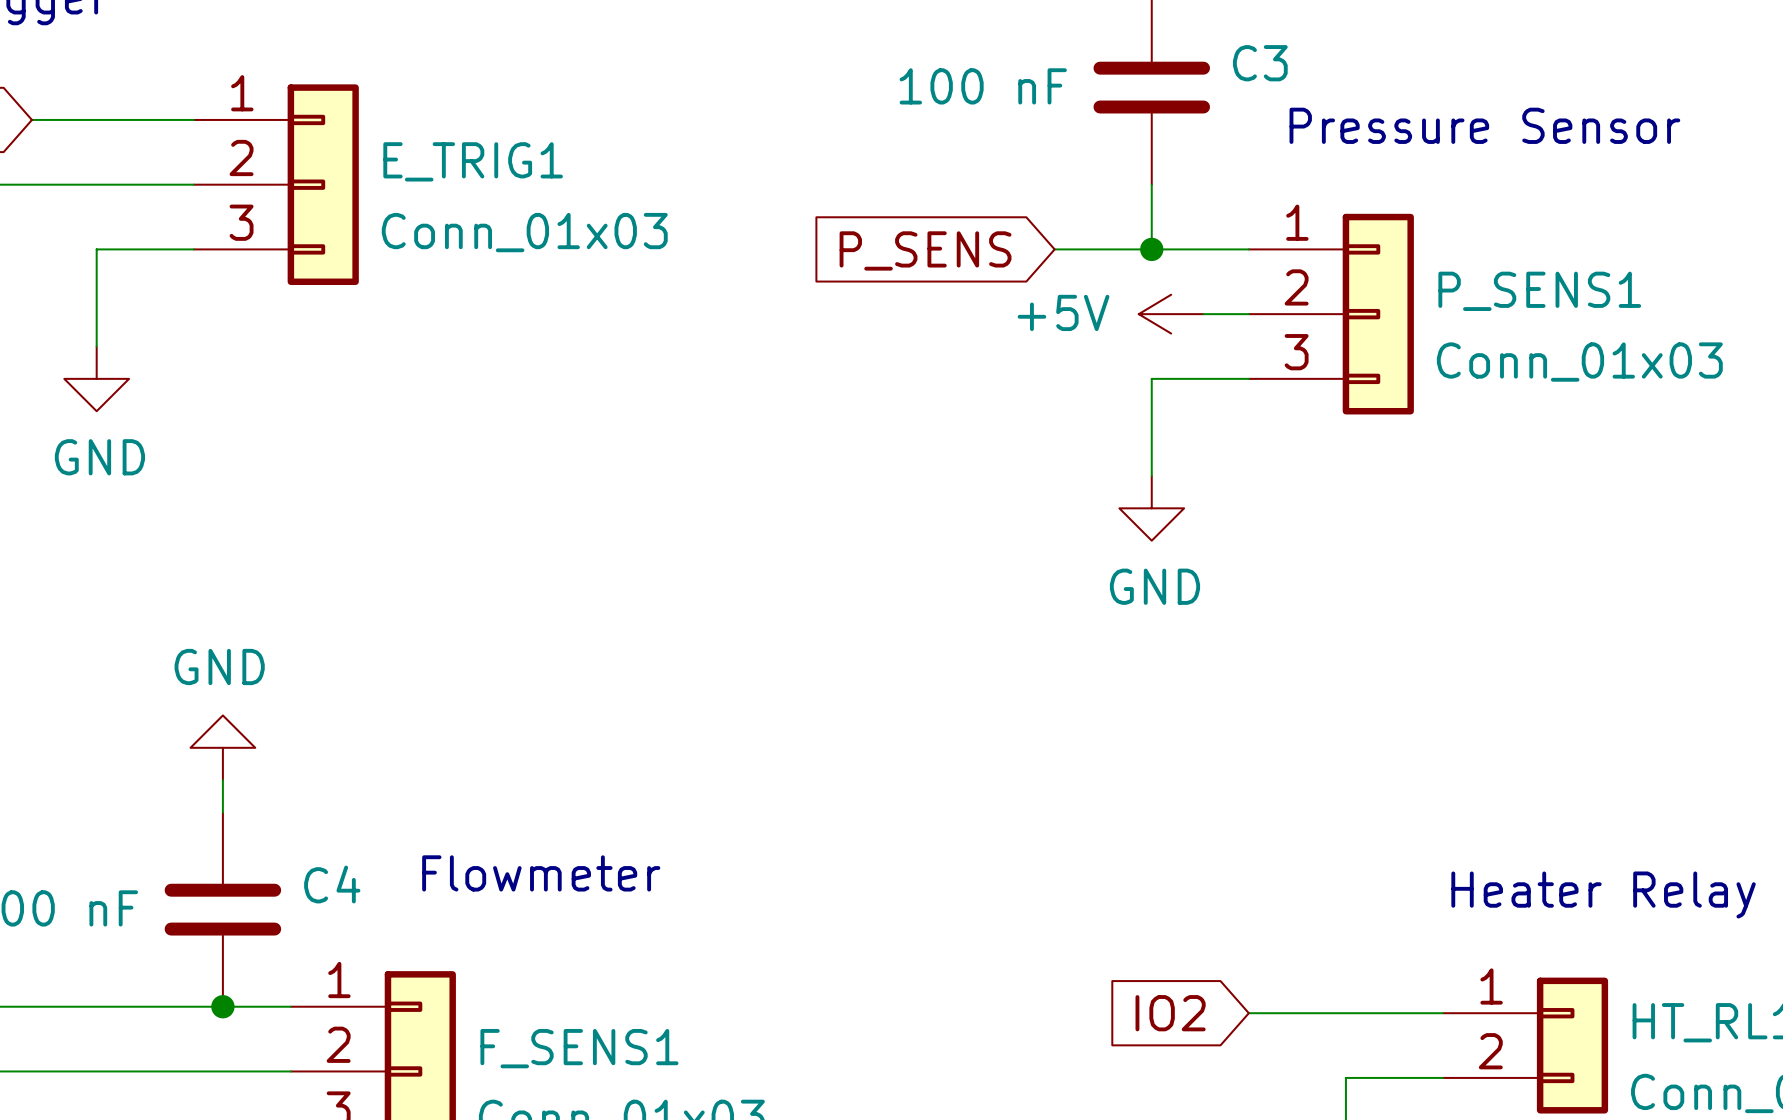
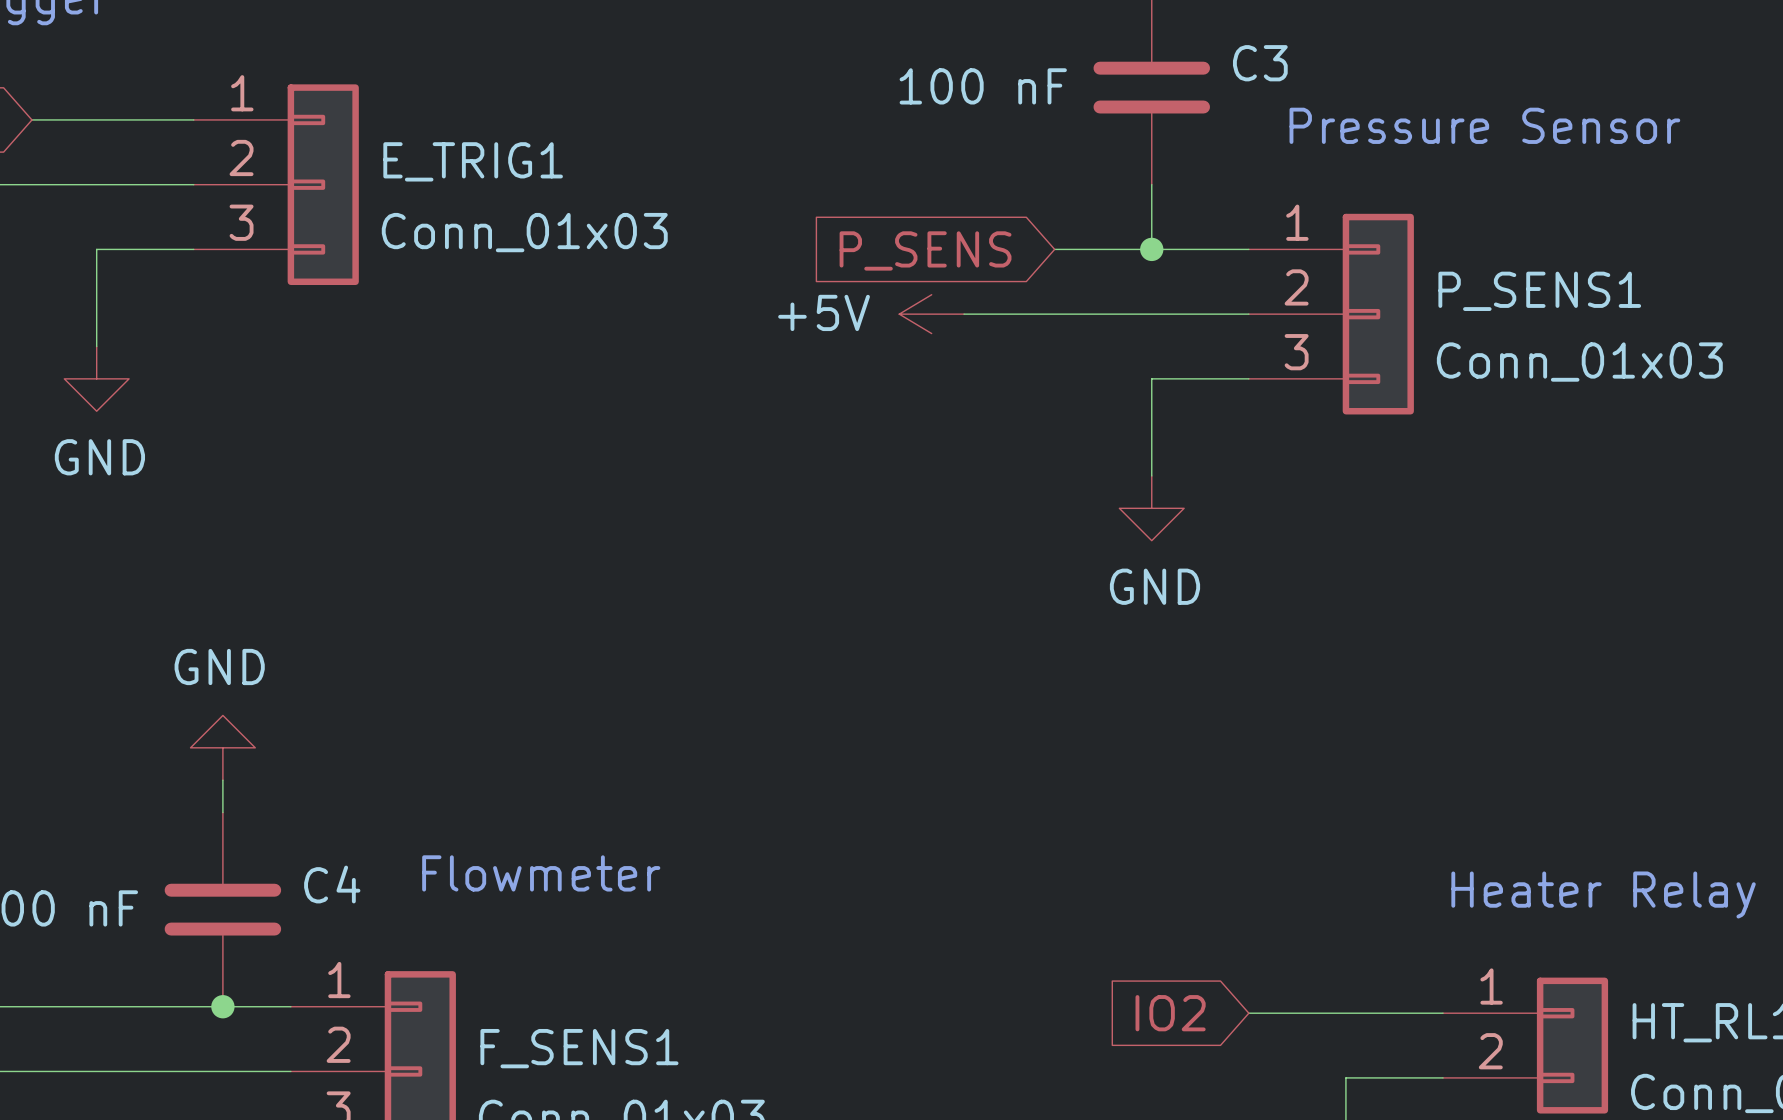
wire: none -> (964, 314) (1203, 314)
power symbol position: +5V (1171, 314) -> +5V (931, 314)

